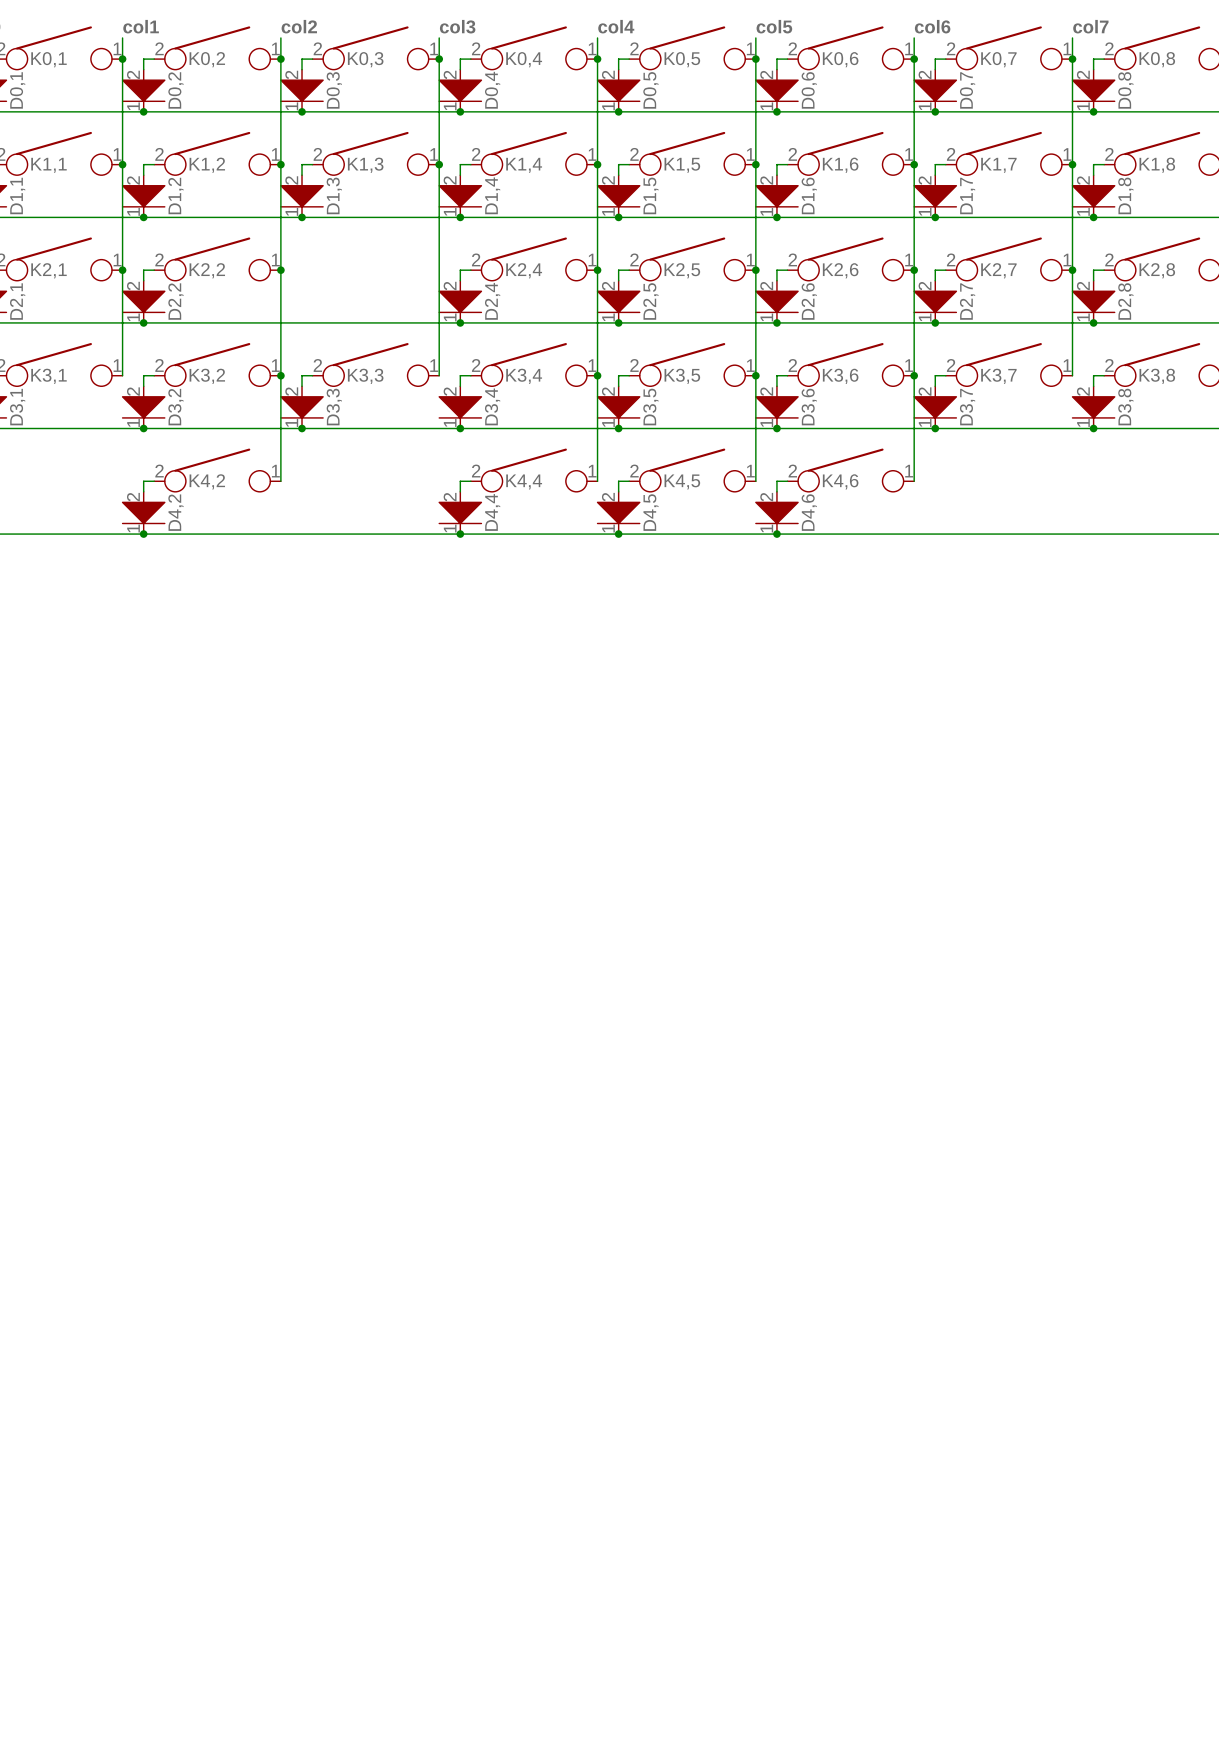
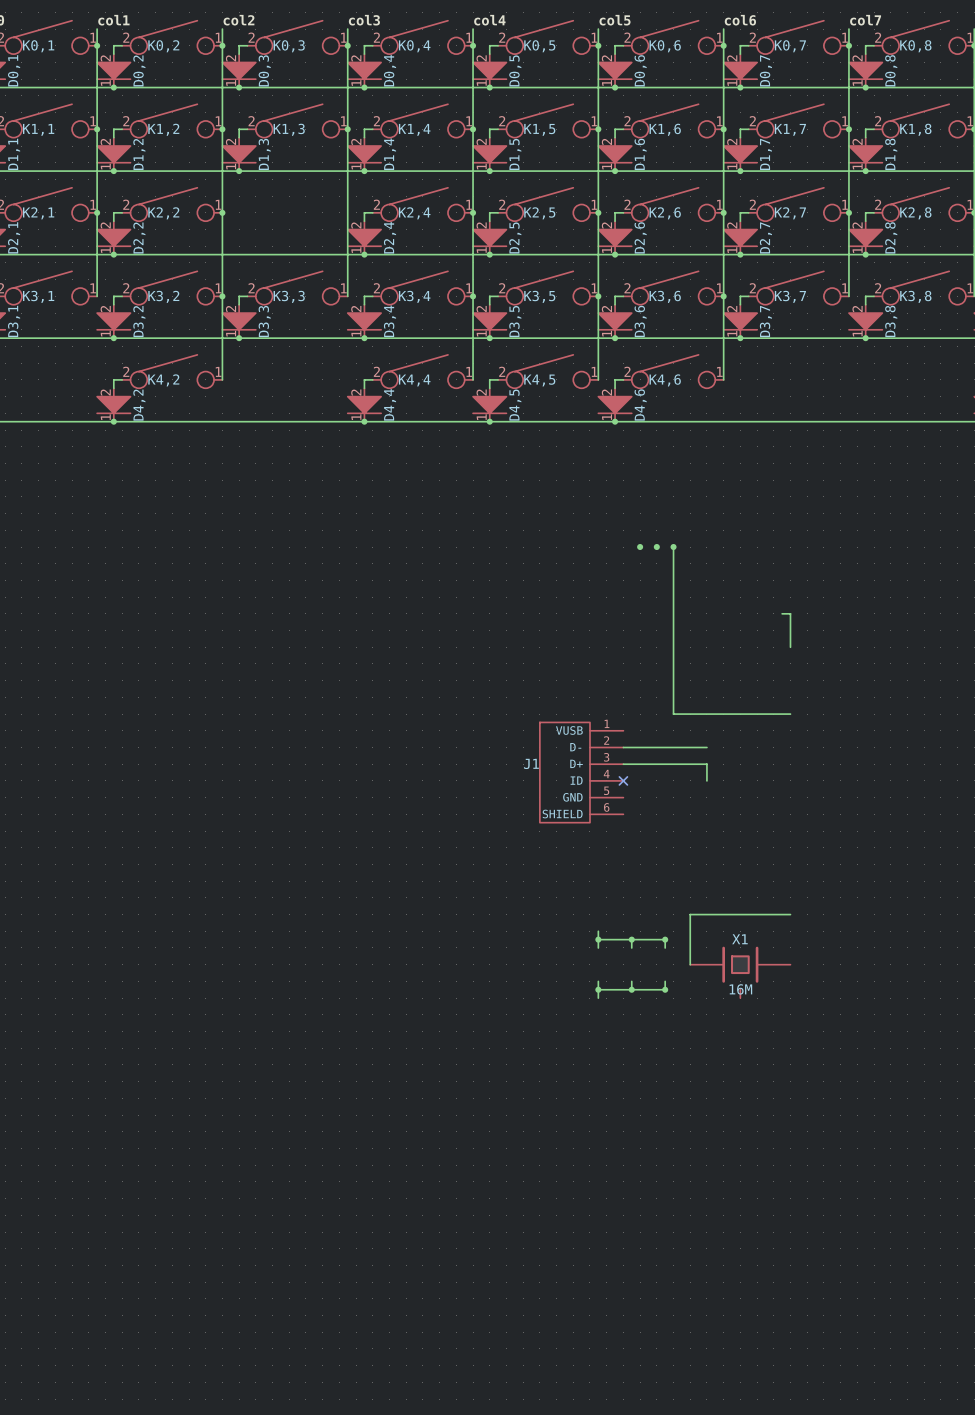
junction: none -> (640, 547)
junction: none -> (656, 547)
wire: none -> (673, 547) (673, 714) (790, 714)
junction: none -> (673, 547)
wire: none -> (782, 613) (790, 613) (790, 647)
wire: none -> (623, 747) (706, 747)
wire: none -> (623, 764) (706, 764) (706, 780)
J1: none -> (581, 772)
no-connect mark: none -> (623, 780)
wire: none -> (790, 914) (690, 914) (690, 964)
wire: none -> (598, 931) (598, 947)
wire: none -> (598, 939) (665, 939) (665, 947)
junction: none -> (598, 939)
wire: none -> (631, 939) (631, 947)
junction: none -> (631, 939)
junction: none -> (665, 939)
X1: none -> 16M (740, 972)
wire: none -> (598, 981) (598, 998)
wire: none -> (631, 981) (631, 989)
wire: none -> (665, 981) (665, 989) (598, 989)
junction: none -> (598, 989)
junction: none -> (631, 989)
junction: none -> (665, 989)

